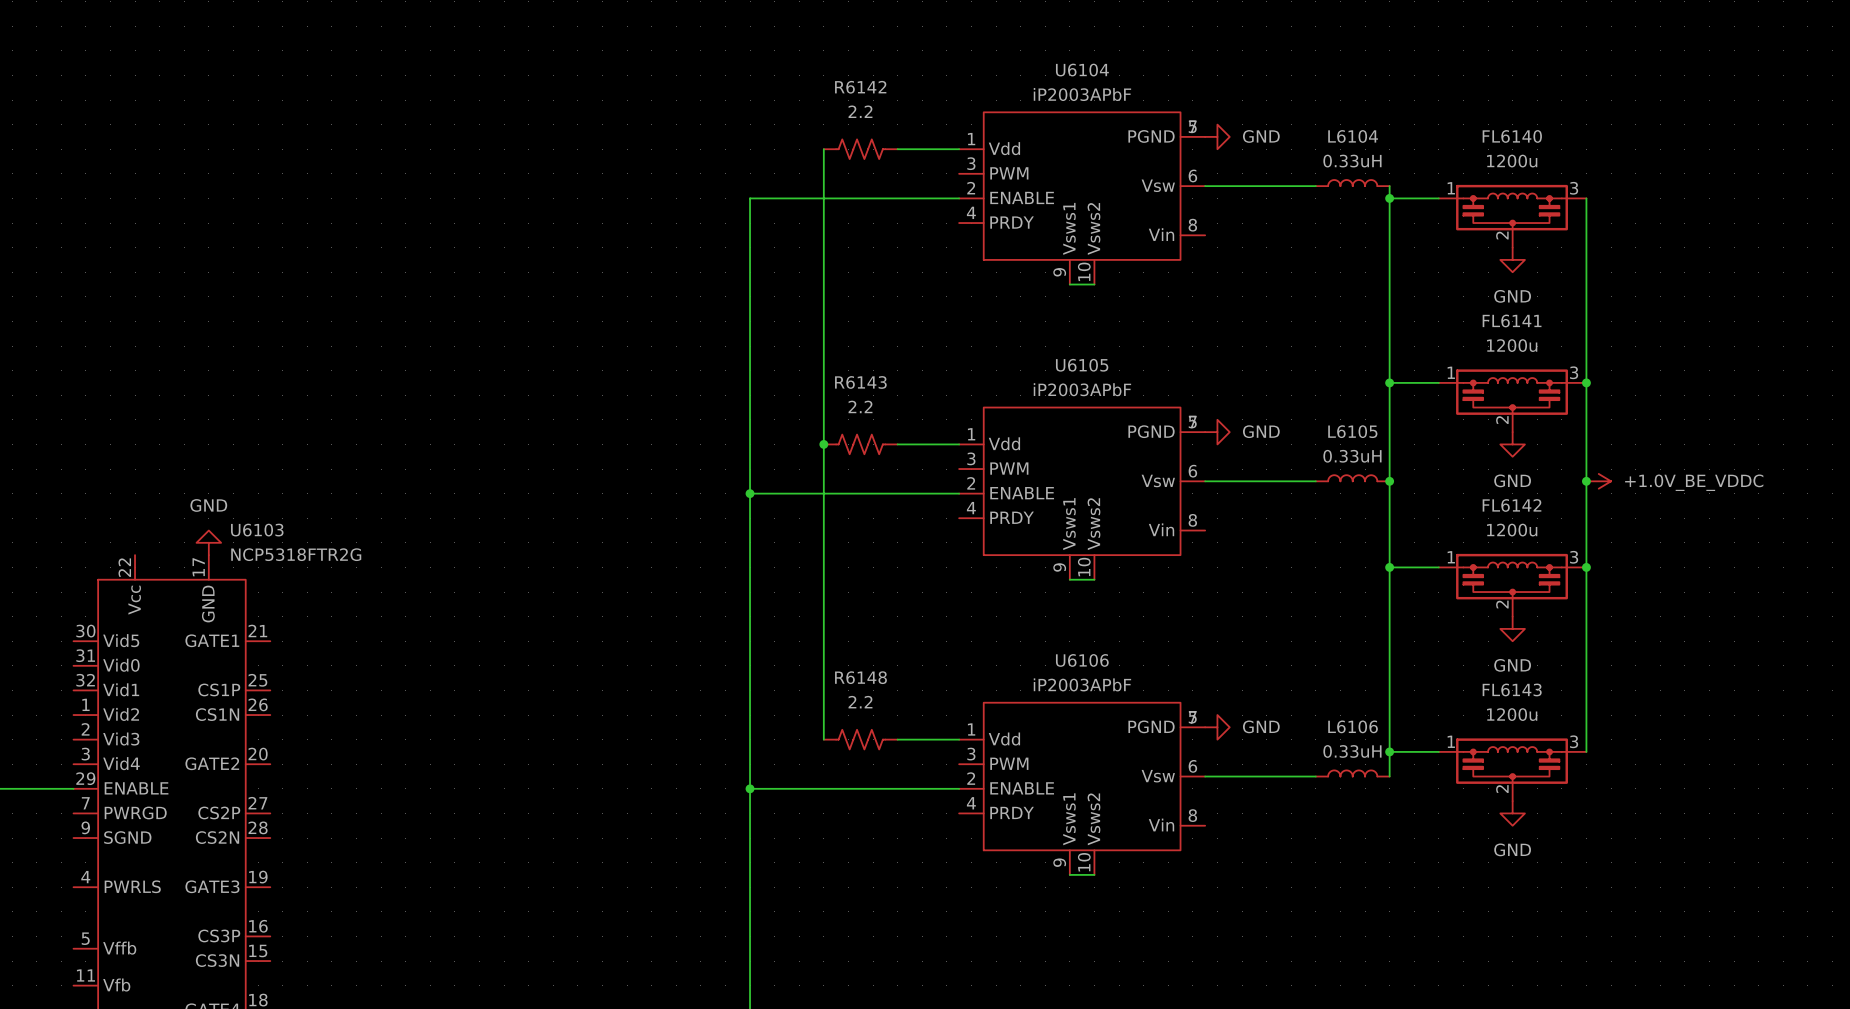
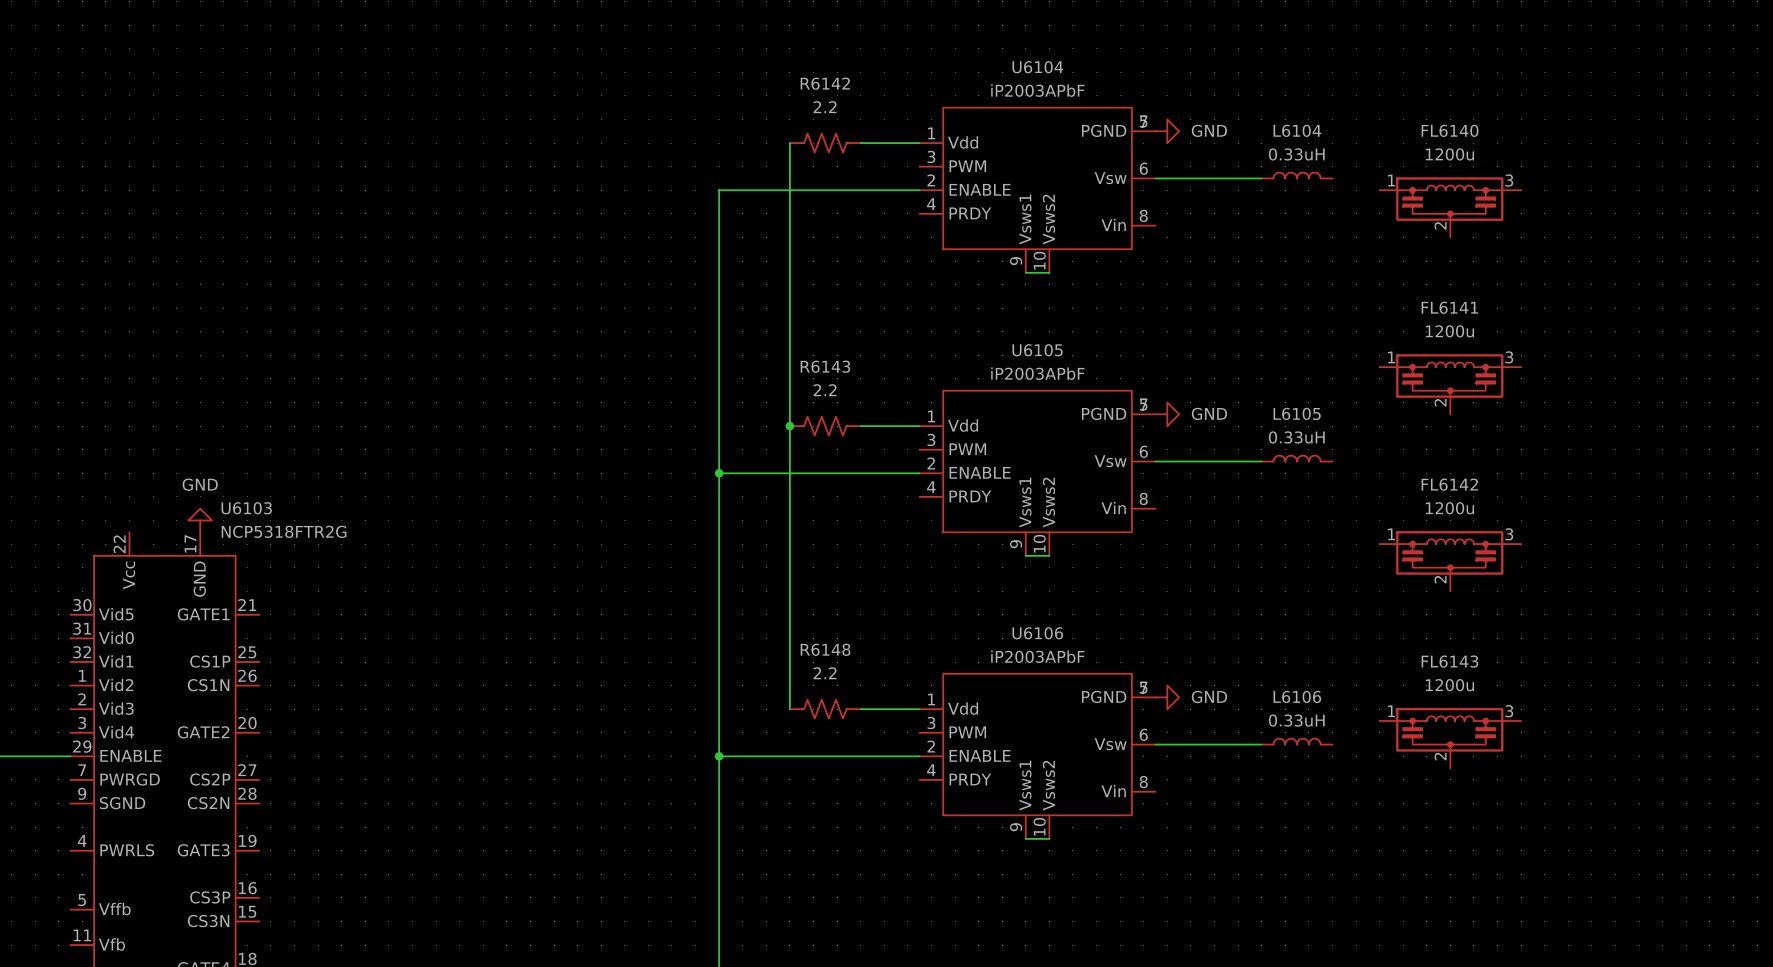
wire: (1389, 186) (1389, 776) -> none
wire: (1389, 198) (1438, 198) -> none
junction: (1389, 198) -> none
wire: (1586, 198) (1586, 751) -> none
power symbol: GND (1512, 259) -> none
wire: (1389, 382) (1438, 382) -> none
junction: (1389, 382) -> none
junction: (1586, 382) -> none
power symbol: GND (1512, 444) -> none
junction: (1389, 481) -> none
junction: (1586, 481) -> none
power symbol: +1.0V_BE_VDDC (1598, 481) -> none
wire: (1389, 567) (1438, 567) -> none
junction: (1389, 567) -> none
junction: (1586, 567) -> none
power symbol: GND (1512, 628) -> none
wire: (1389, 751) (1438, 751) -> none
junction: (1389, 751) -> none
power symbol: GND (1512, 813) -> none

